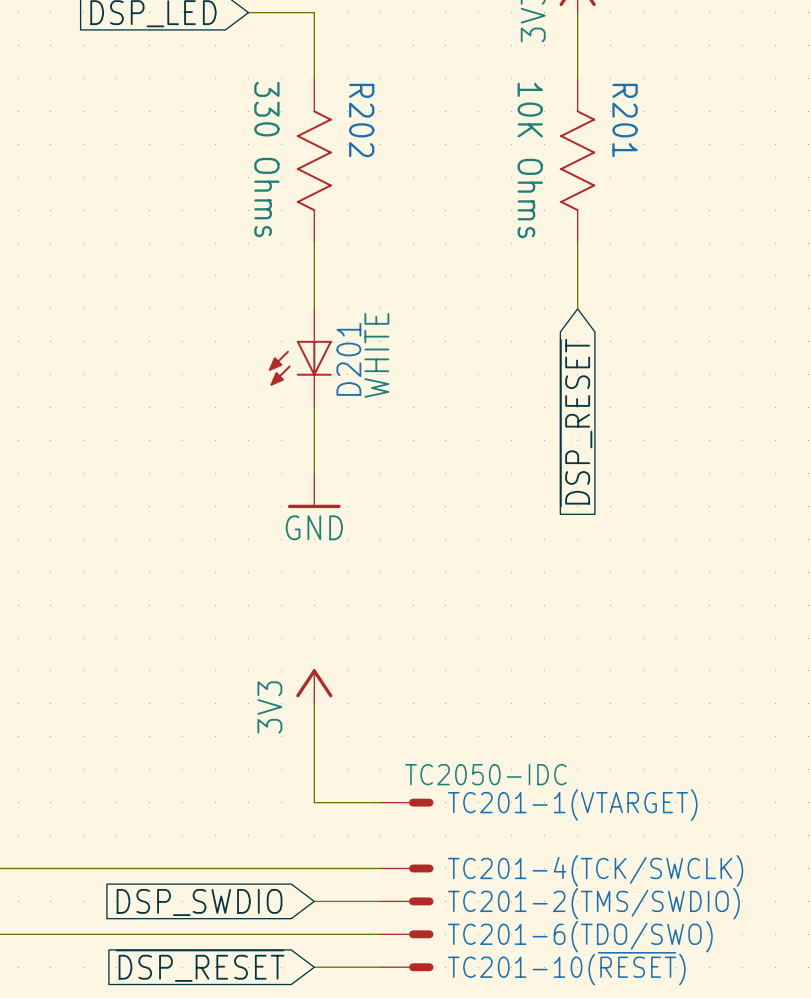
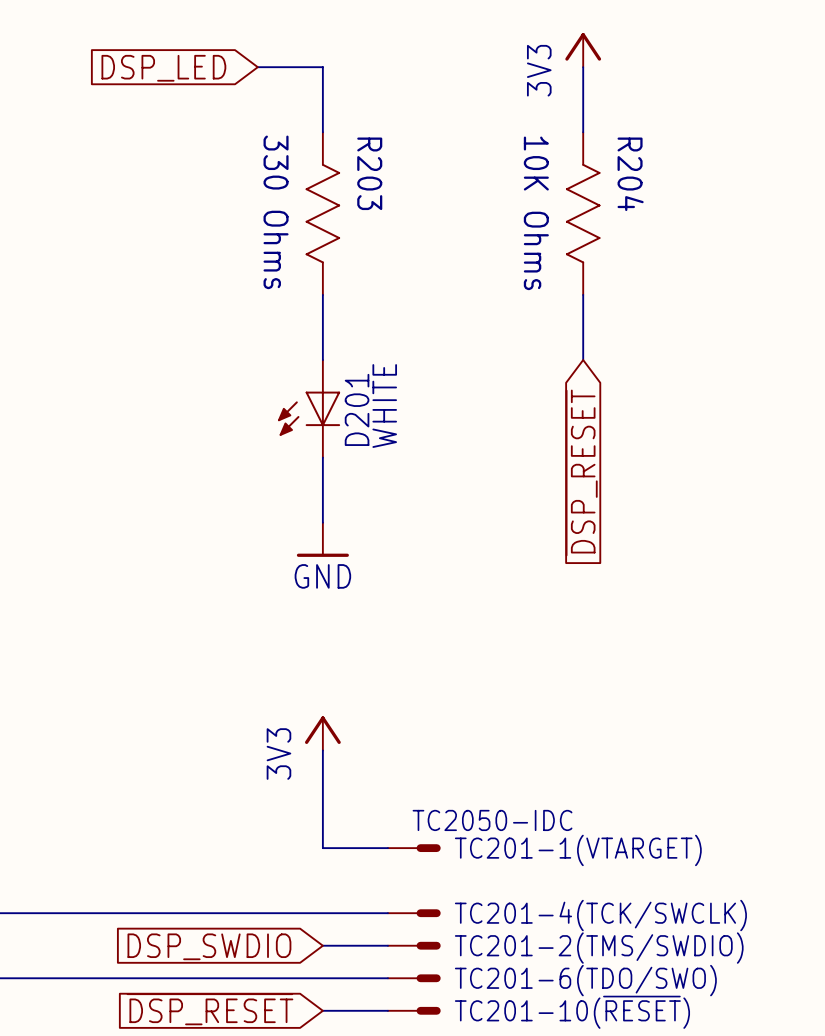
R202 name: R202 (361, 120) -> R203 (369, 173)
R201 name: R201 (625, 120) -> R204 (630, 174)

